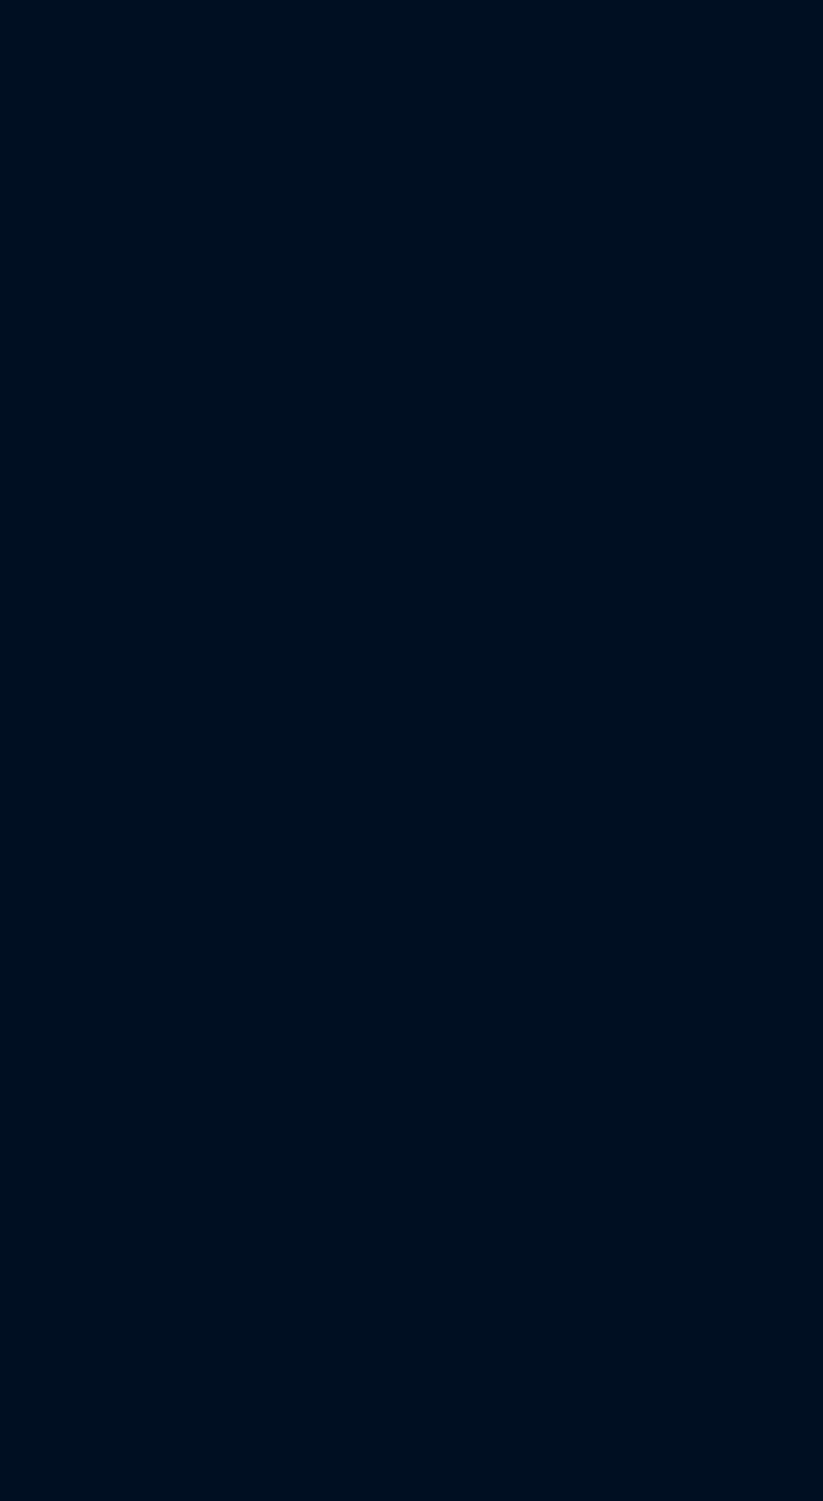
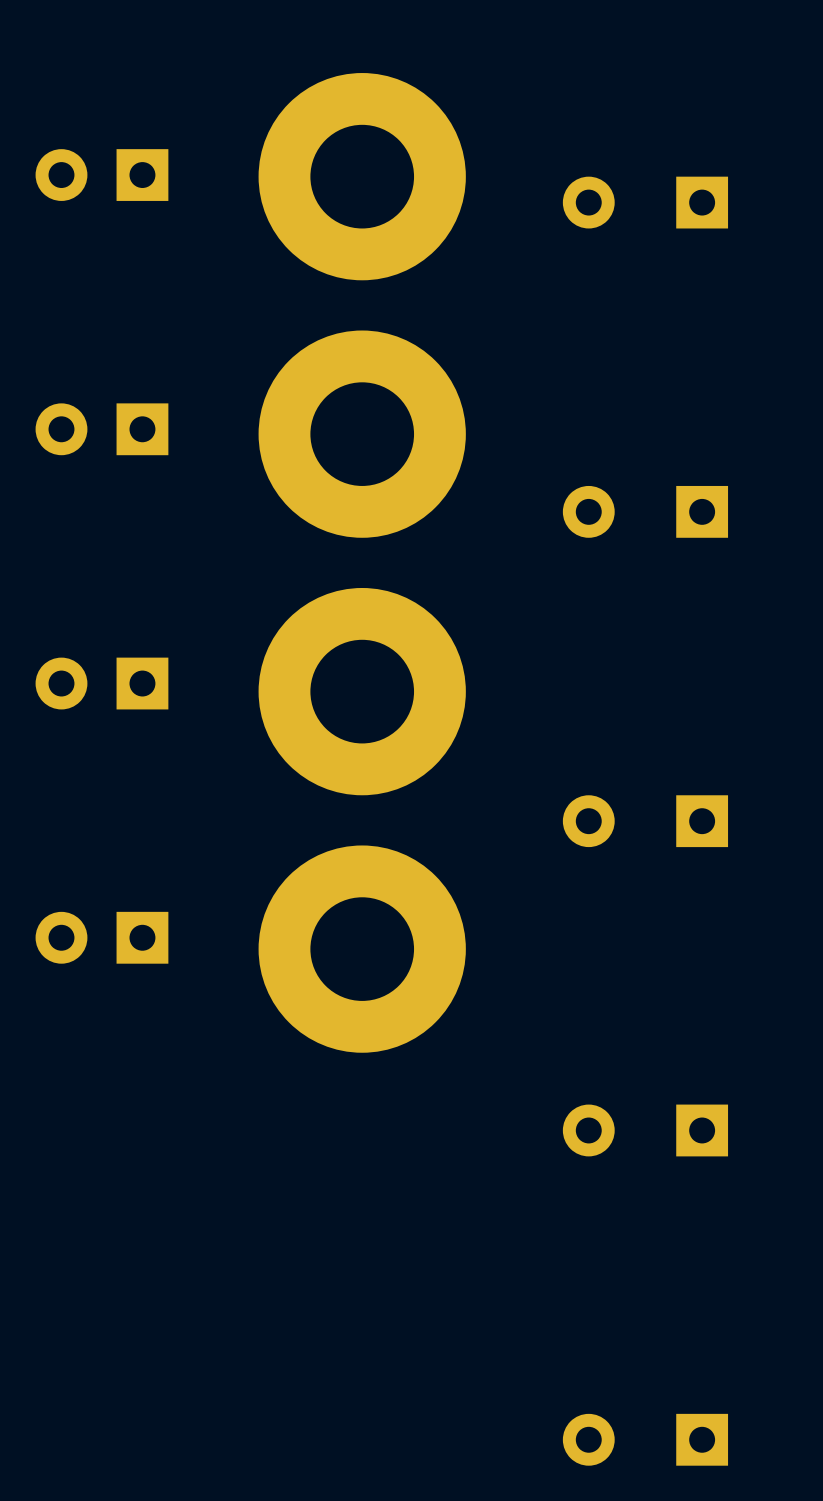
part: none -> (101, 175)
part: none -> (362, 176)
part: none -> (645, 202)
part: none -> (101, 429)
part: none -> (362, 434)
part: none -> (645, 511)
part: none -> (101, 683)
part: none -> (362, 691)
part: none -> (645, 821)
part: none -> (101, 937)
part: none -> (362, 949)
part: none -> (645, 1130)
part: none -> (645, 1439)

